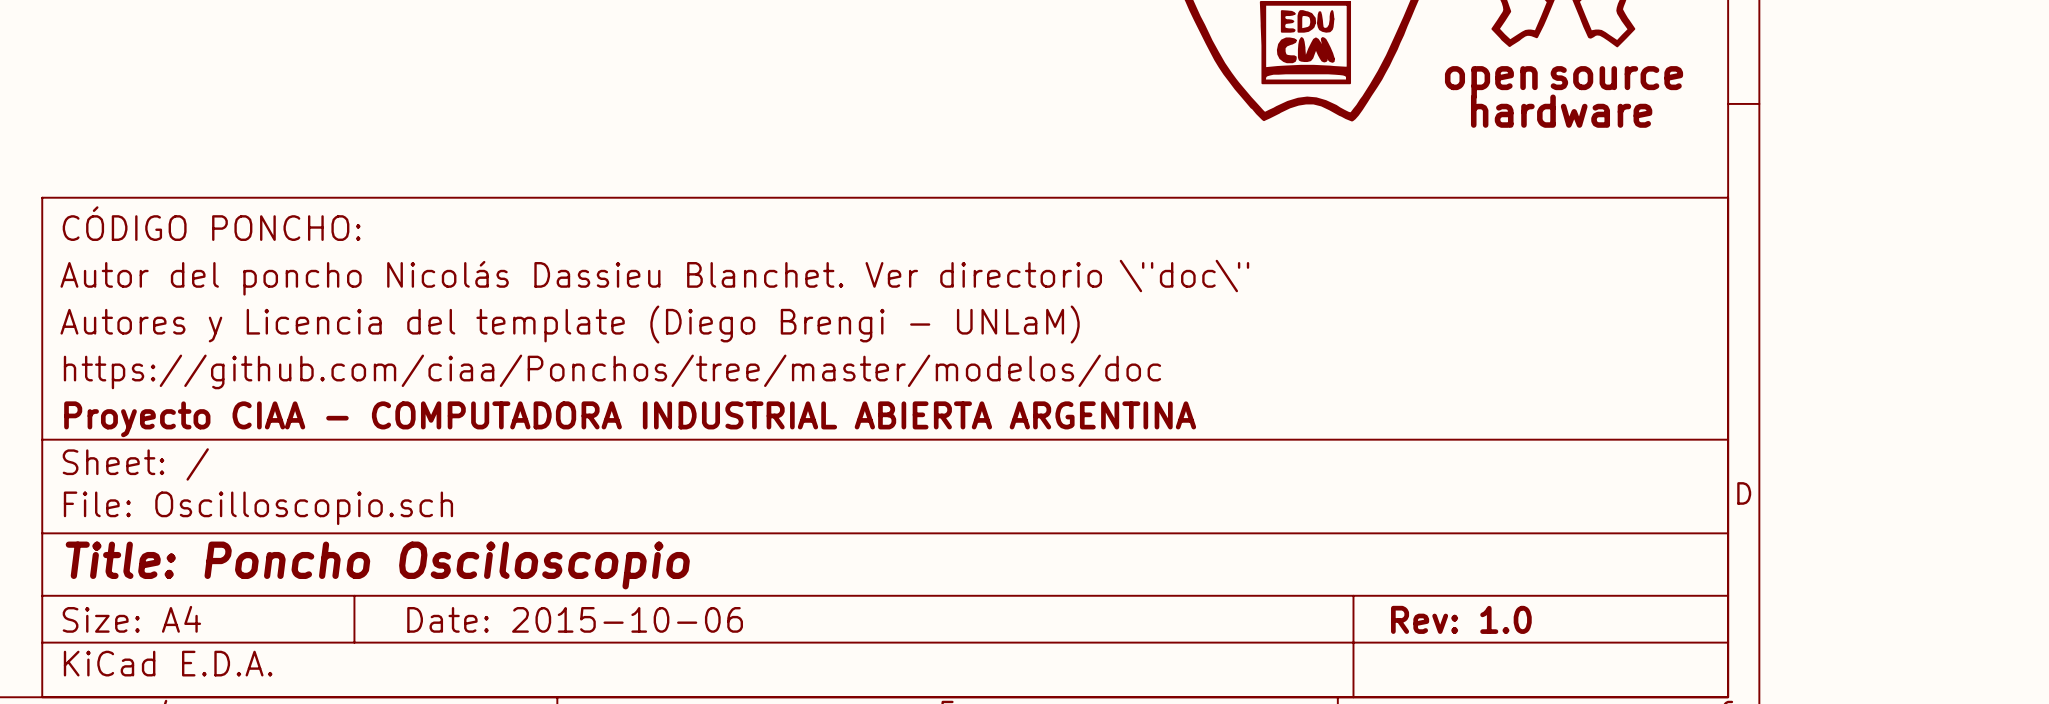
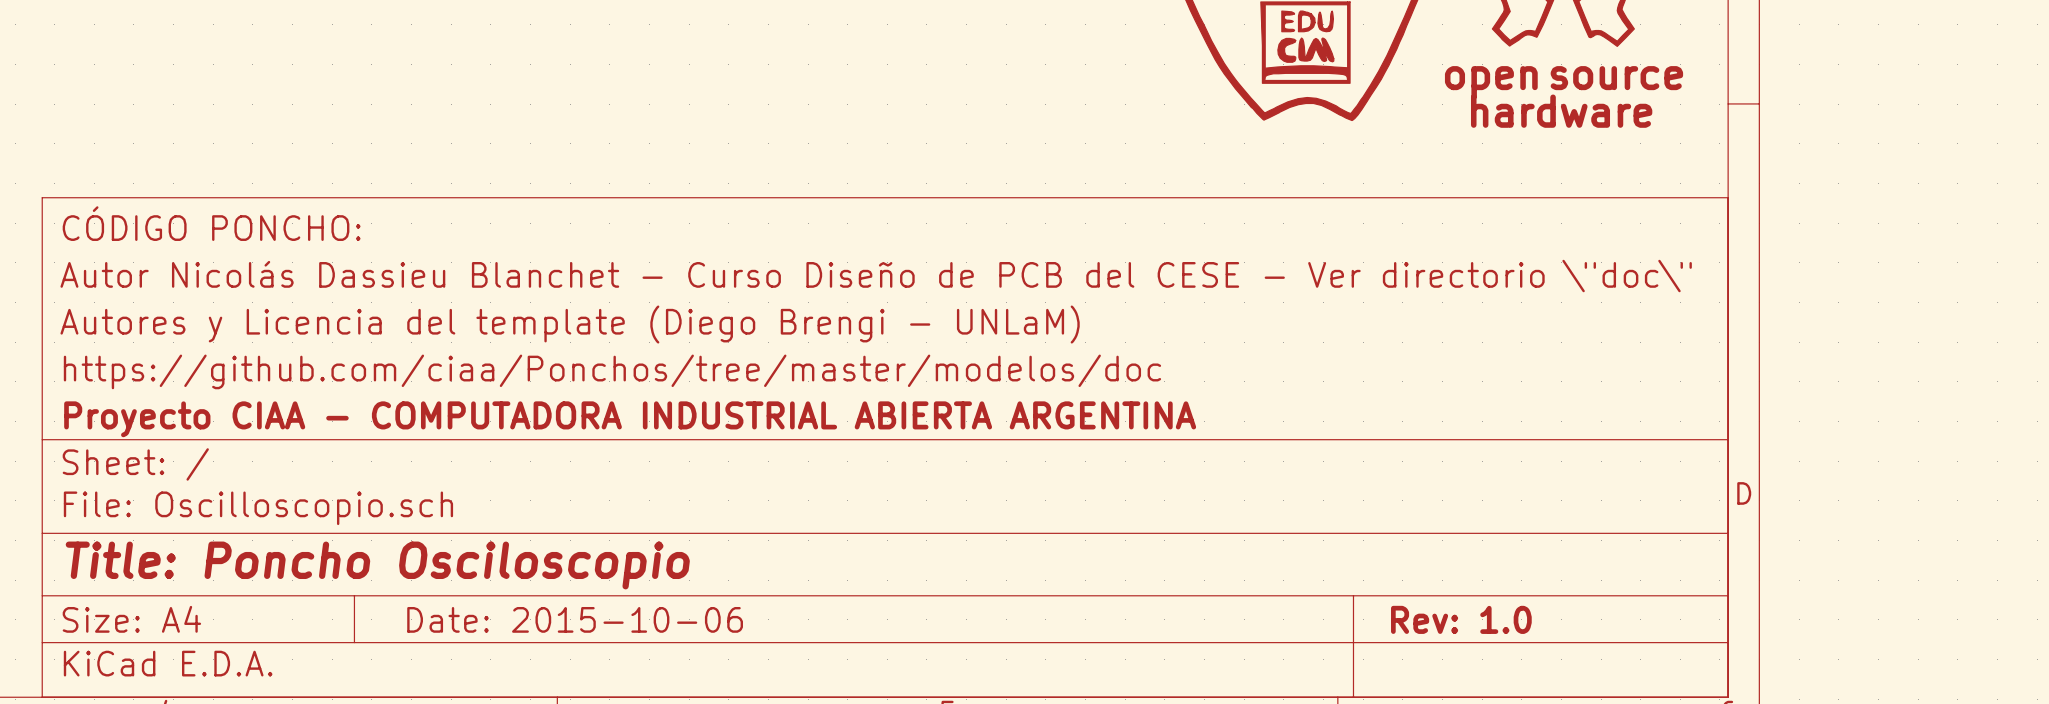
title block: Autor del poncho Nicolás Dassieu Blanchet. Ver directorio \"doc\" (654, 277) -> Autor Nicolás Dassieu Blanchet - Curso Diseño de PCB del CESE - Ver directorio \"doc\" (876, 276)

